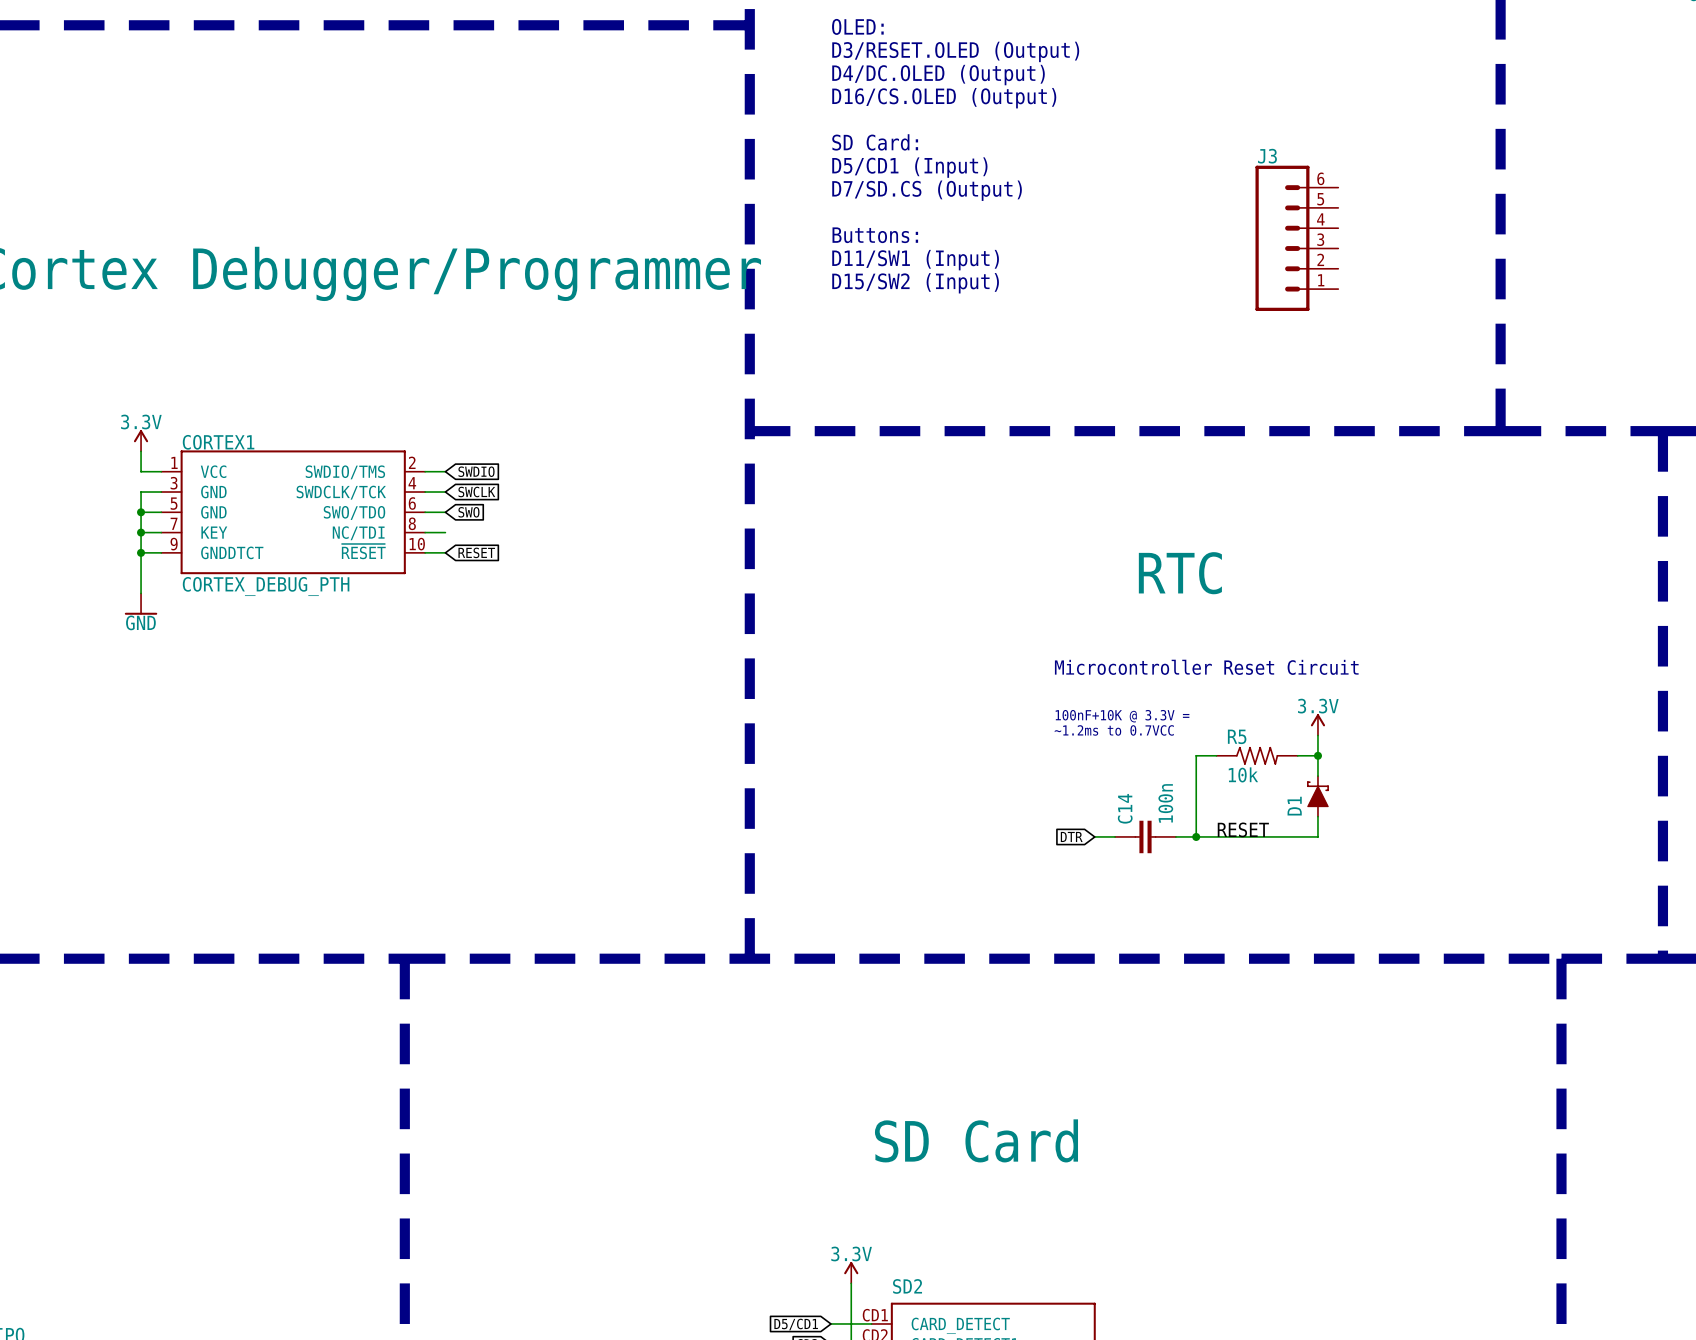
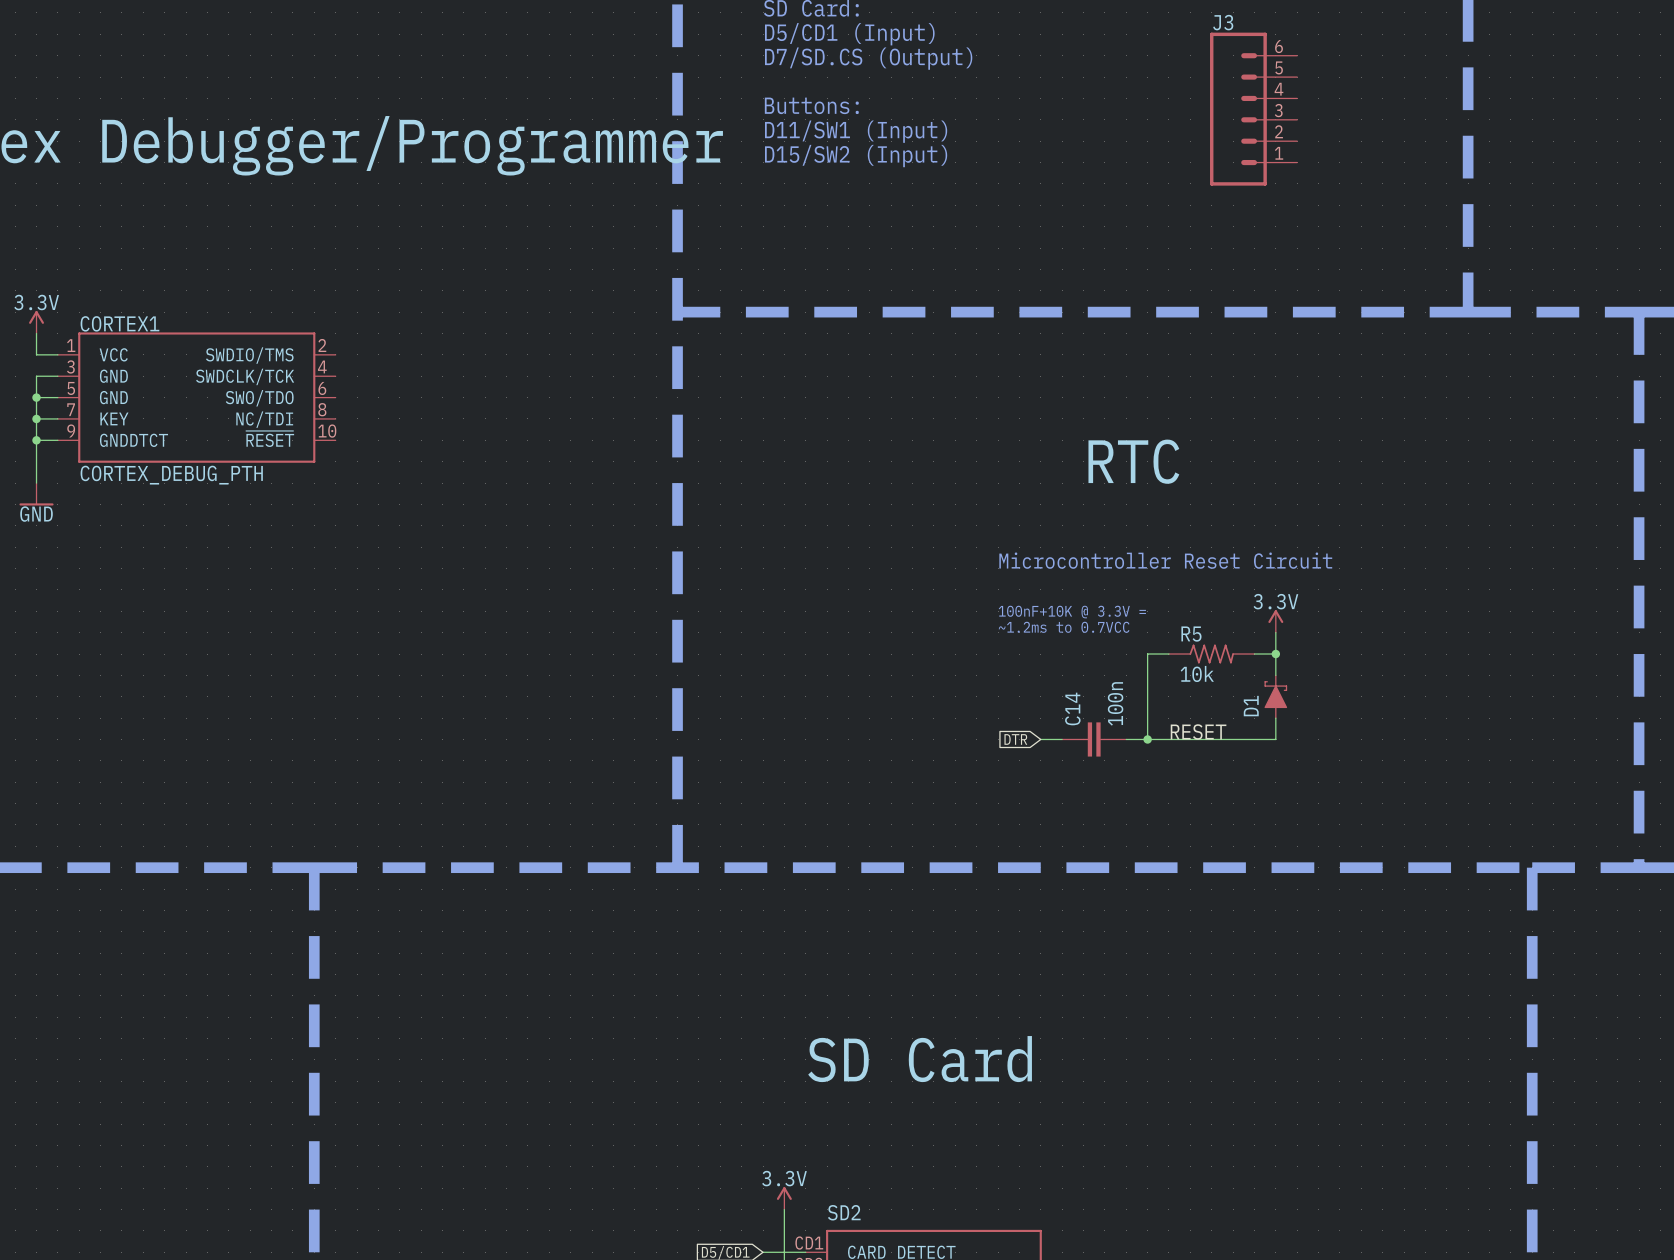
wire: (425, 471) (445, 471) -> none
global label: SWDIO (476, 471) -> none
wire: (425, 492) (445, 492) -> none
global label: SWCLK (476, 492) -> none
wire: (425, 512) (445, 512) -> none
global label: SWO (468, 512) -> none
wire: (425, 532) (445, 532) -> none
wire: (425, 552) (445, 552) -> none
global label: RESET (476, 552) -> none

